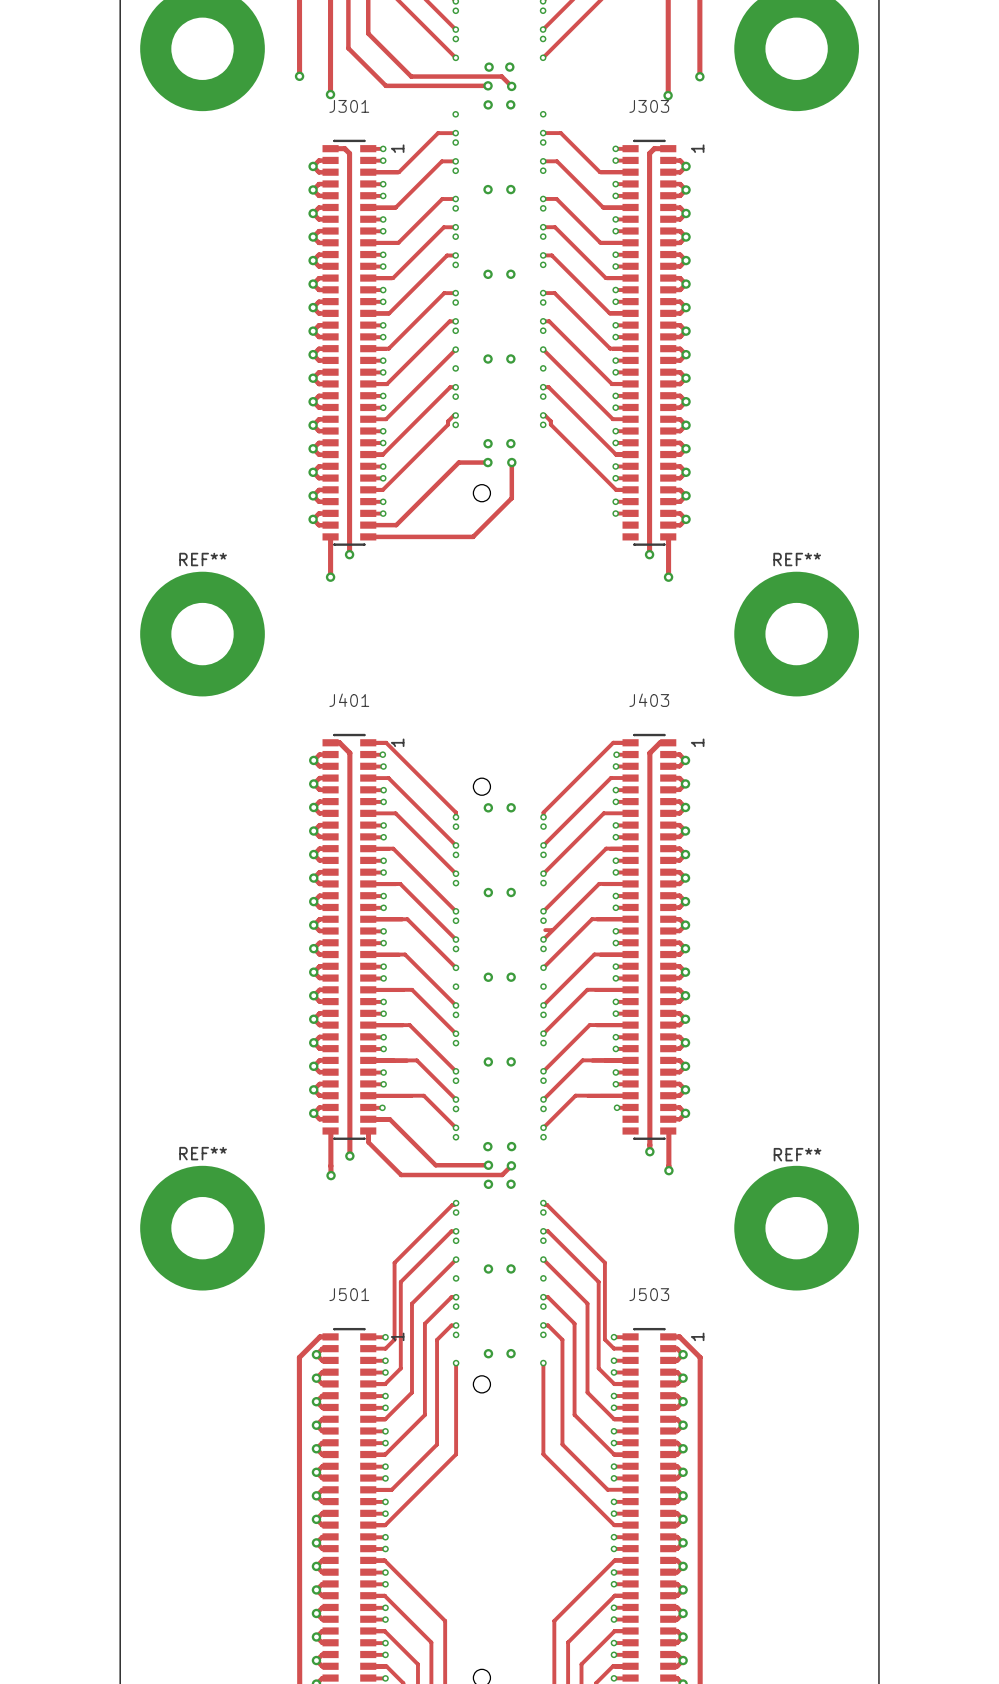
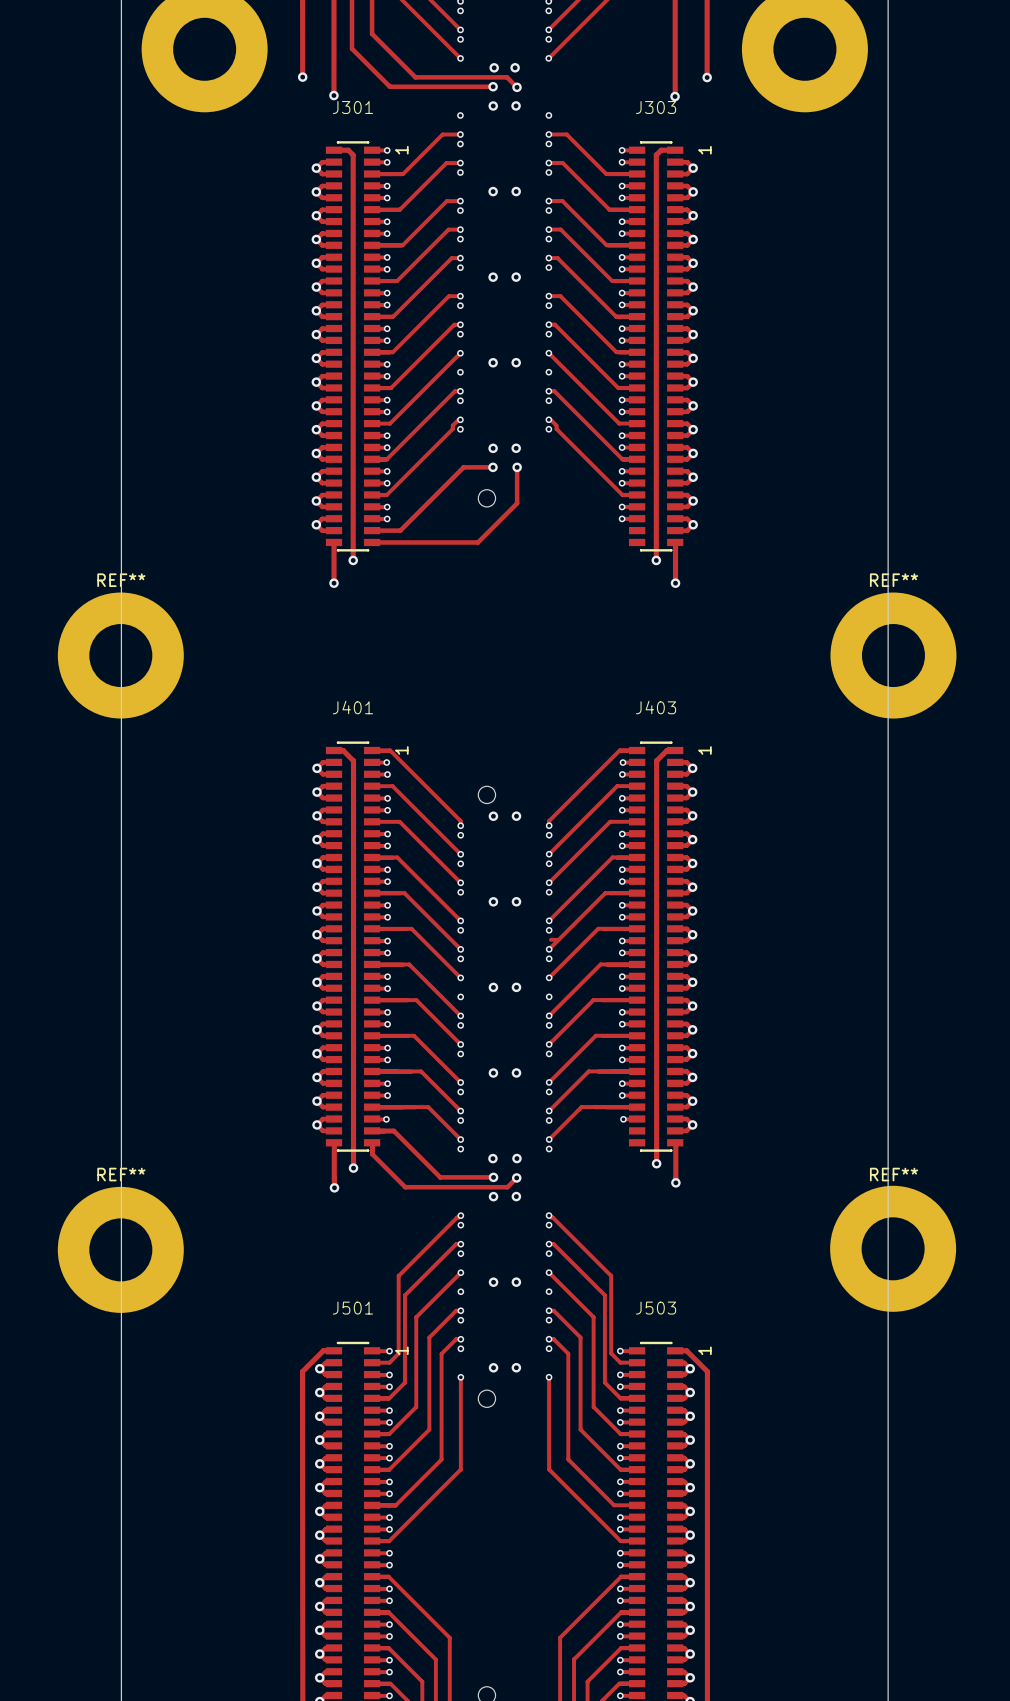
part position: (202, 634) -> (120, 655)
part position: (796, 634) -> (893, 655)
part position: (202, 1228) -> (120, 1249)
part position: (796, 1228) -> (893, 1248)

